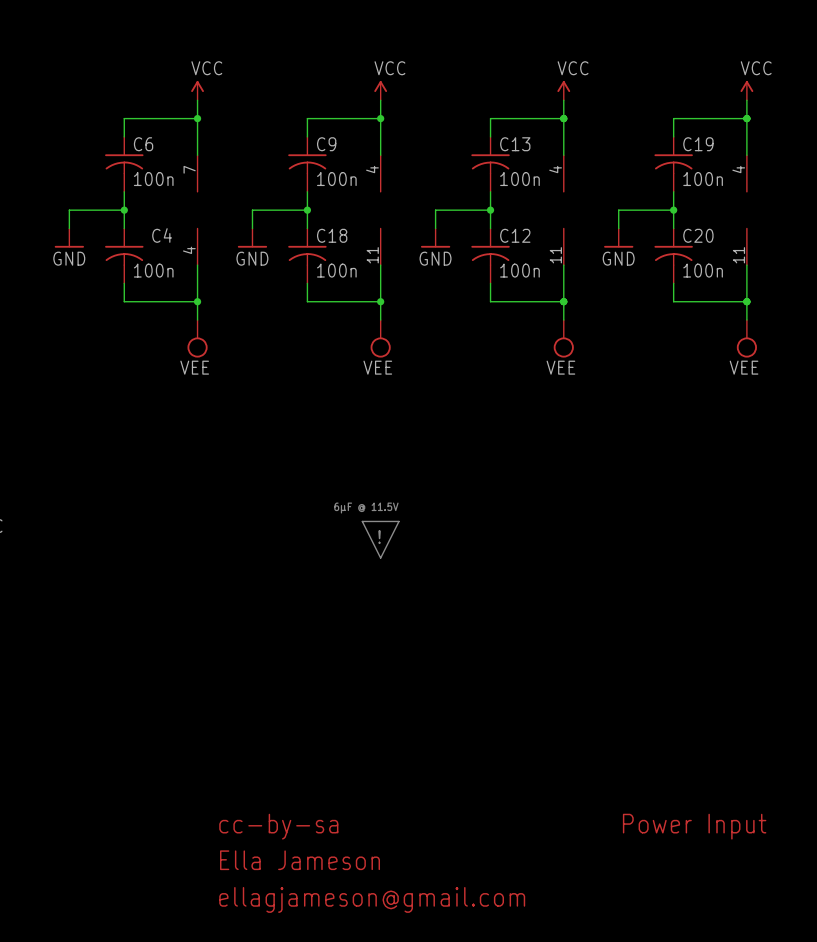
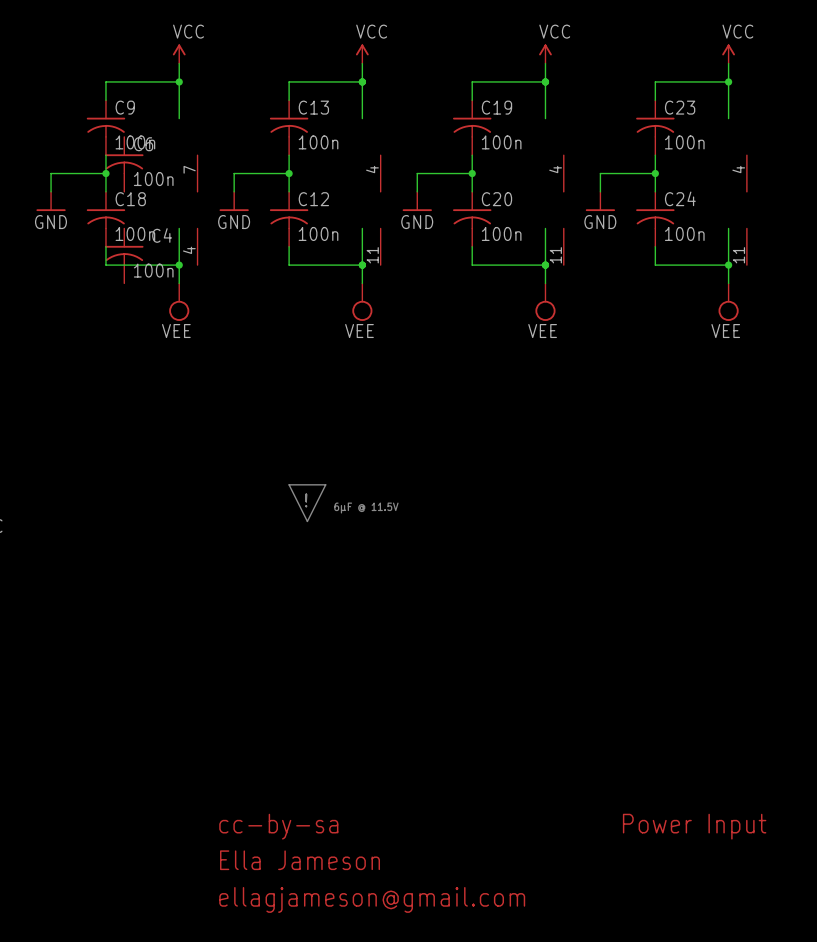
power symbol position: VCC (197, 90) -> VCC (179, 54)
power symbol position: VCC (380, 90) -> VCC (362, 54)
power symbol position: VCC (563, 90) -> VCC (545, 54)
power symbol position: VCC (746, 90) -> VCC (728, 54)
wire: (197, 100) (197, 155) -> (179, 63) (179, 118)
wire: (380, 100) (380, 155) -> (362, 63) (362, 118)
wire: (563, 100) (563, 155) -> (545, 63) (545, 118)
wire: (746, 100) (746, 155) -> (728, 63) (728, 118)
wire: (197, 118) (124, 118) (124, 136) -> (179, 81) (105, 81) (105, 100)
junction position: (197, 118) -> (179, 81)
wire: (380, 118) (307, 118) (307, 136) -> (362, 81) (289, 81) (289, 100)
junction position: (380, 118) -> (362, 81)
wire: (563, 118) (490, 118) (490, 136) -> (545, 81) (472, 81) (472, 100)
junction position: (563, 118) -> (545, 81)
wire: (746, 118) (673, 118) (673, 136) -> (728, 81) (655, 81) (655, 100)
junction position: (746, 118) -> (728, 81)
C23: none -> 100n (655, 127)
C9 position: (307, 164) -> (105, 127)
C13 position: (490, 164) -> (289, 127)
C19 position: (673, 164) -> (472, 127)
junction: none -> (105, 173)
junction: none -> (289, 173)
junction: none -> (472, 173)
junction: none -> (655, 173)
wire: (124, 191) (124, 228) -> (105, 155) (105, 191)
wire: (307, 191) (307, 228) -> (289, 155) (289, 191)
wire: (490, 191) (490, 228) -> (472, 155) (472, 191)
wire: (673, 191) (673, 228) -> (655, 155) (655, 191)
wire: (124, 210) (69, 210) (69, 228) -> (105, 173) (51, 173) (51, 191)
junction: (124, 210) -> none
wire: (307, 210) (252, 210) (252, 228) -> (289, 173) (234, 173) (234, 191)
junction: (307, 210) -> none
wire: (490, 210) (435, 210) (435, 228) -> (472, 173) (417, 173) (417, 191)
junction: (490, 210) -> none
wire: (673, 210) (618, 210) (618, 228) -> (655, 173) (600, 173) (600, 191)
junction: (673, 210) -> none
C24: none -> 100n (655, 219)
power symbol position: GND (69, 238) -> GND (51, 201)
power symbol position: GND (252, 238) -> GND (234, 201)
power symbol position: GND (435, 238) -> GND (417, 201)
power symbol position: GND (618, 238) -> GND (600, 201)
C18 position: (307, 255) -> (105, 219)
C12 position: (490, 255) -> (289, 219)
C20 position: (673, 255) -> (472, 219)
junction: none -> (179, 265)
wire: (197, 265) (197, 320) -> (179, 228) (179, 283)
junction: none -> (362, 265)
wire: (380, 265) (380, 320) -> (362, 228) (362, 283)
junction: none -> (545, 265)
wire: (563, 265) (563, 320) -> (545, 228) (545, 283)
junction: none -> (728, 265)
wire: (746, 265) (746, 320) -> (728, 228) (728, 283)
wire: (124, 283) (124, 301) (197, 301) -> (105, 246) (105, 265) (179, 265)
wire: (307, 283) (307, 301) (380, 301) -> (289, 246) (289, 265) (362, 265)
wire: (490, 283) (490, 301) (563, 301) -> (472, 246) (472, 265) (545, 265)
wire: (673, 283) (673, 301) (746, 301) -> (655, 246) (655, 265) (728, 265)
junction: (197, 301) -> none
junction: (380, 301) -> none
junction: (563, 301) -> none
junction: (746, 301) -> none
power symbol position: VEE (197, 338) -> VEE (179, 302)
power symbol position: VEE (380, 338) -> VEE (362, 302)
power symbol position: VEE (563, 338) -> VEE (545, 302)
power symbol position: VEE (746, 338) -> VEE (728, 302)
line: (362, 521) (380, 558) (398, 521) (362, 521) -> (289, 484) (307, 521) (325, 484) (289, 484)
text position: ! (379, 537) -> ! (306, 500)

